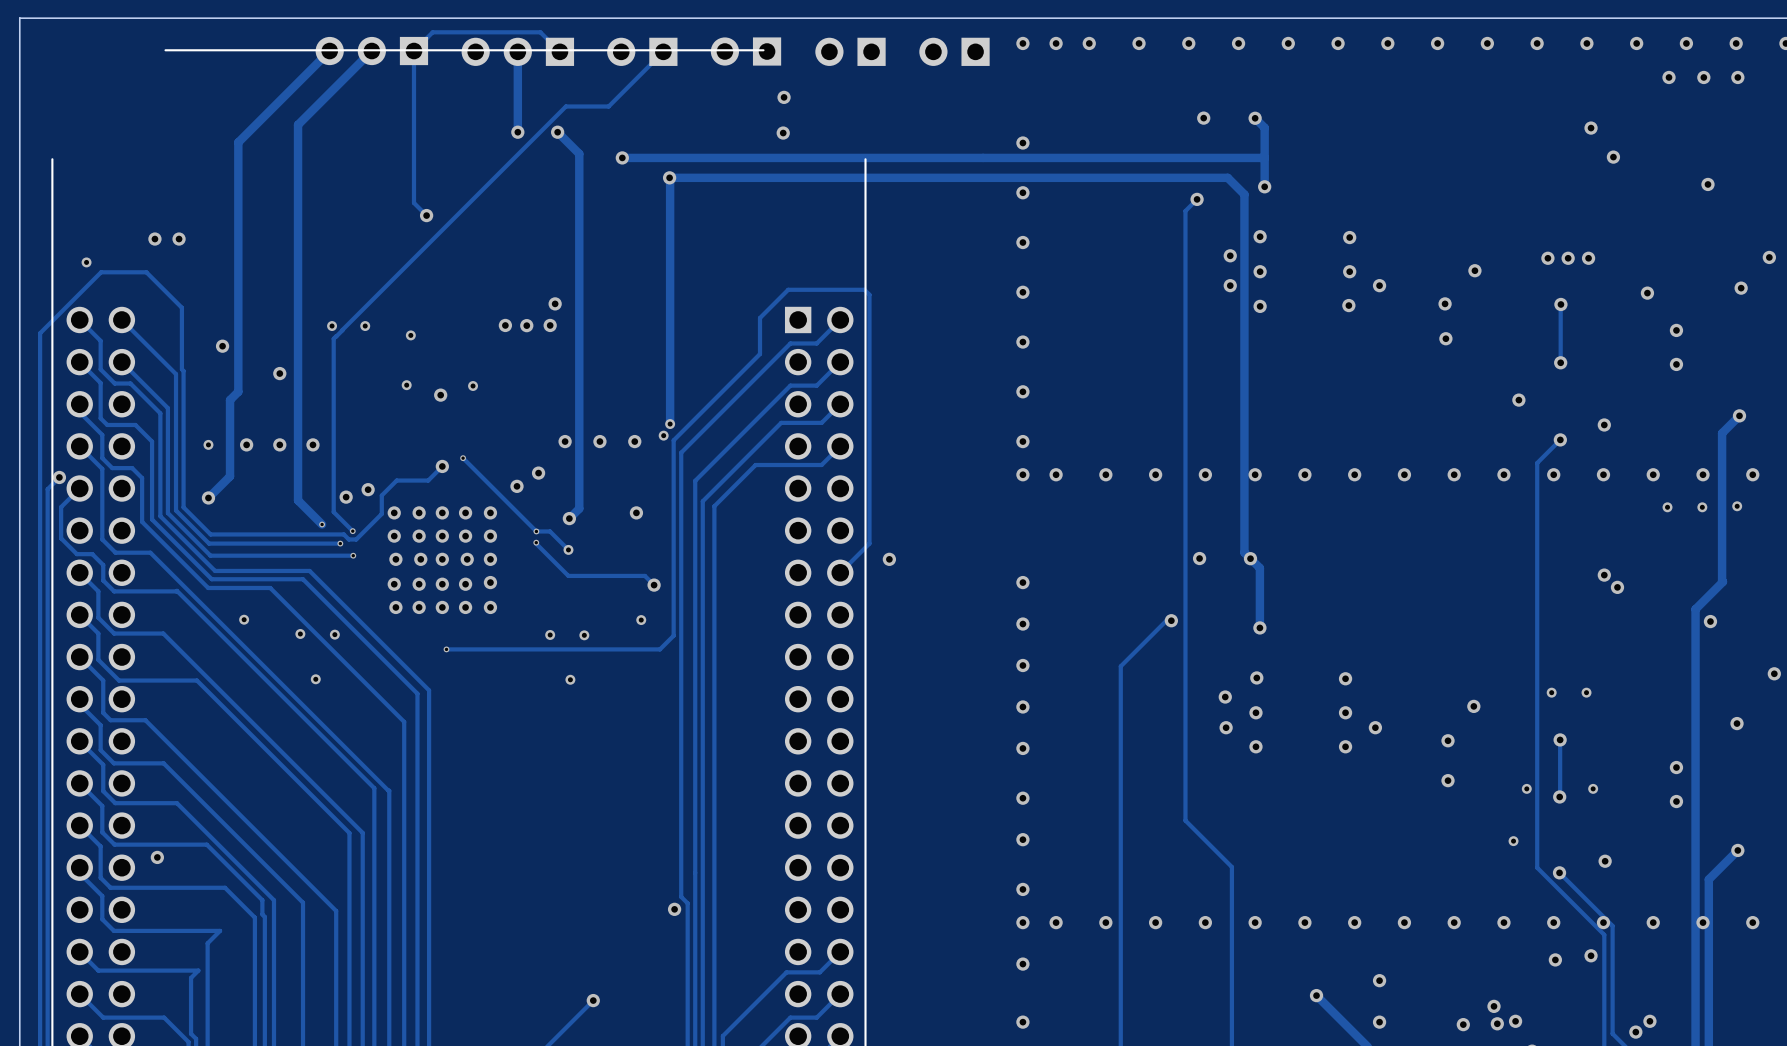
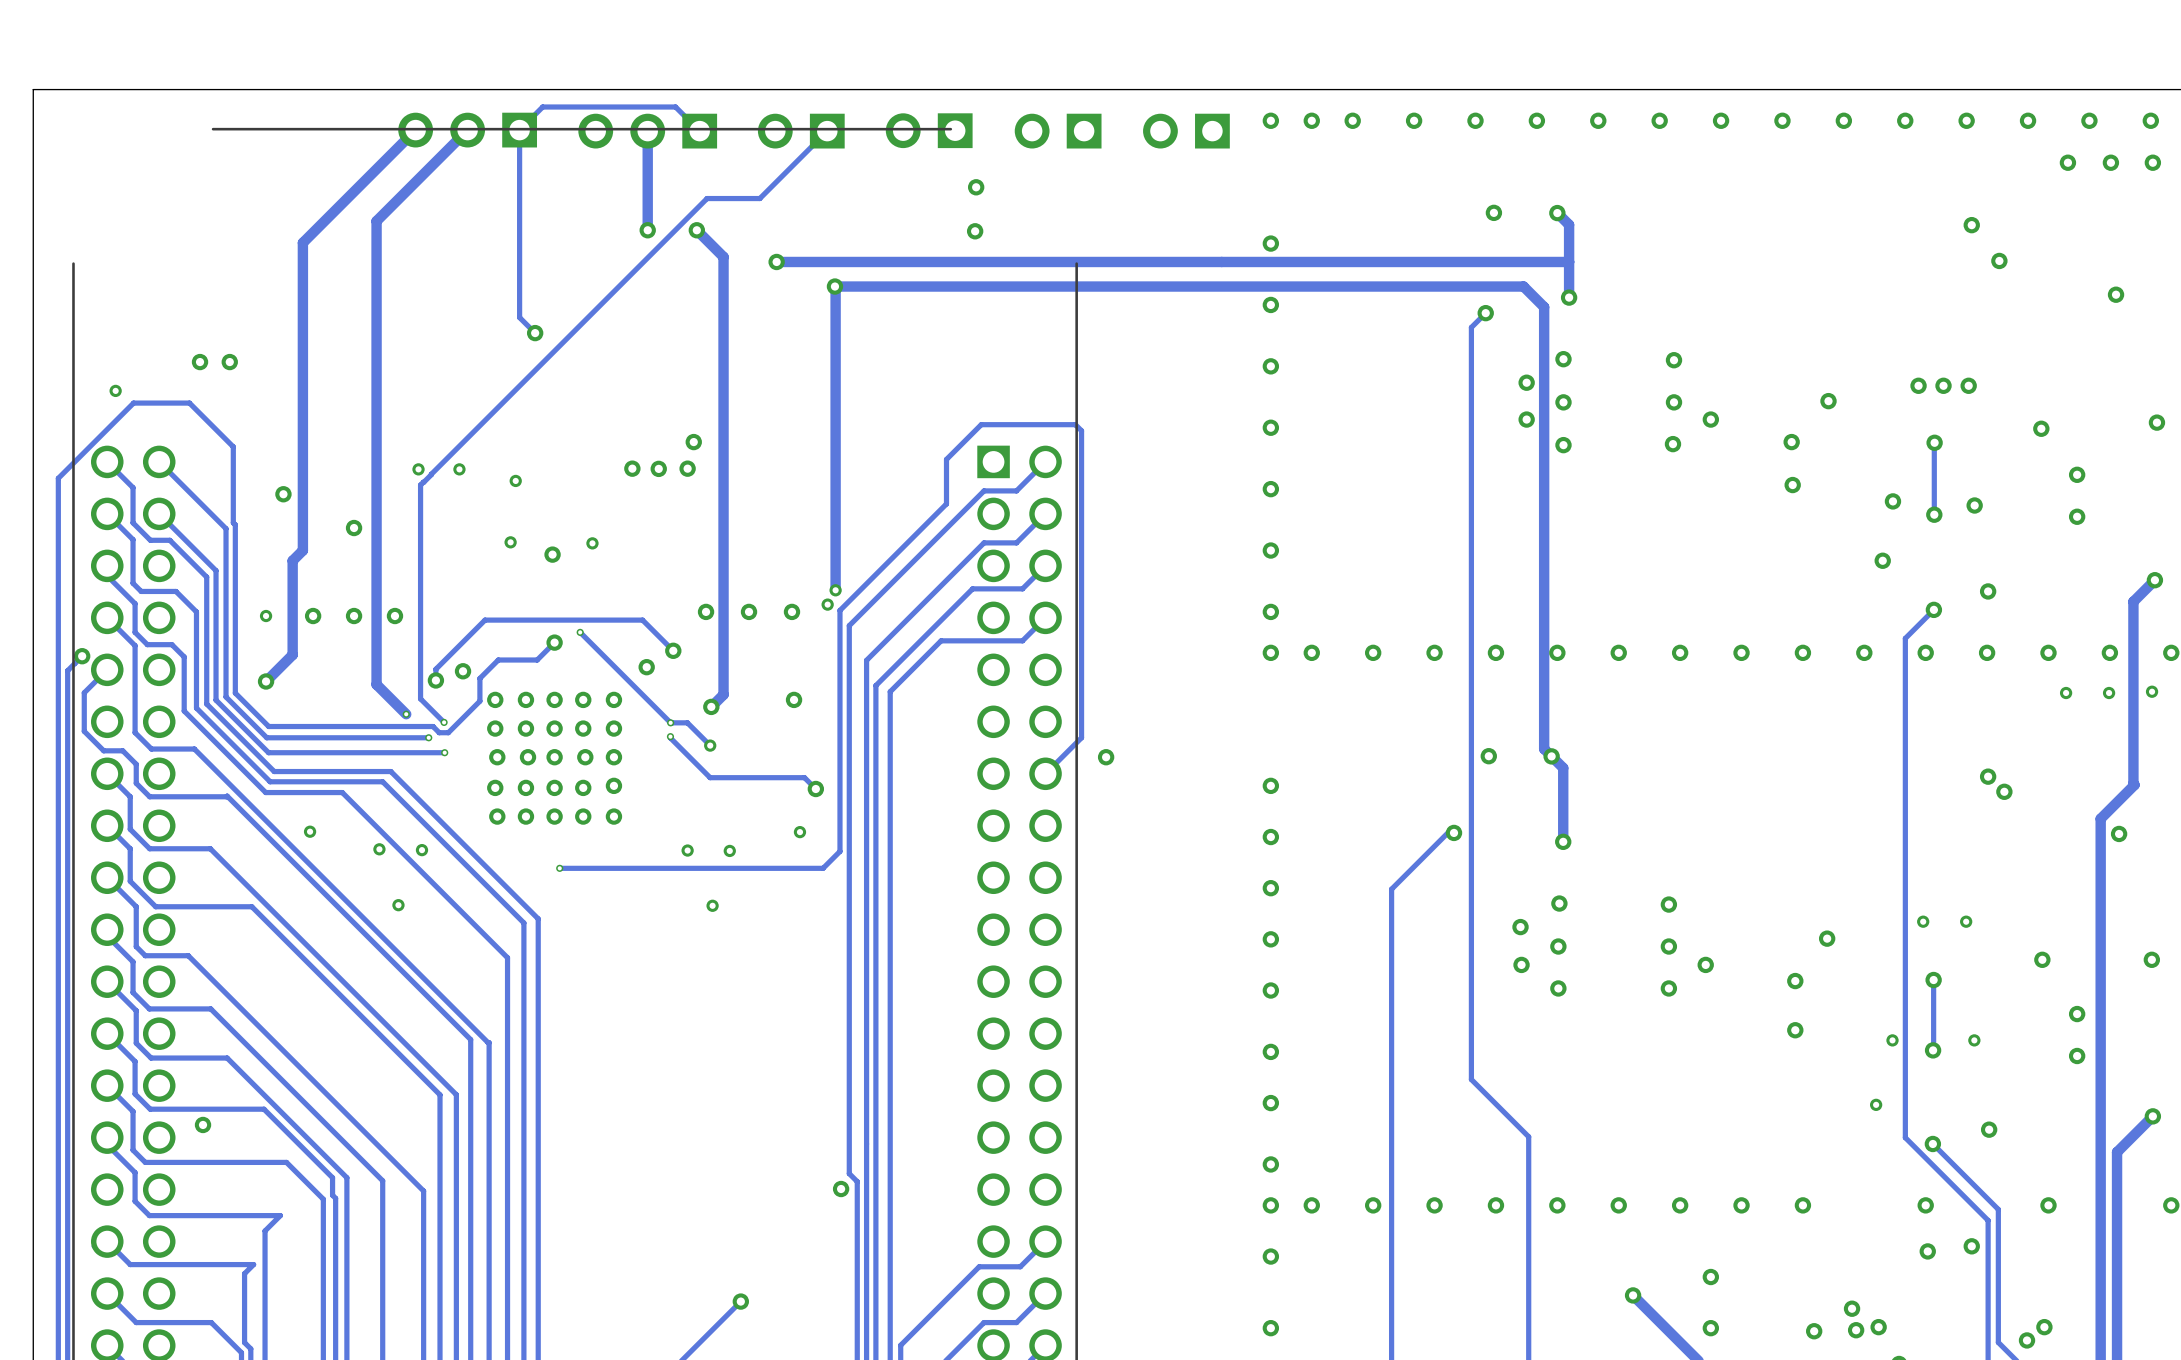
via: none -> (1892, 501)
via: none -> (1974, 505)
track: none -> (673, 650) (642, 620) (485, 620) (435, 669) (435, 680)
via: none -> (2042, 959)
via: (1503, 922) -> none
via: (1603, 922) -> none
via: (1703, 922) -> none

